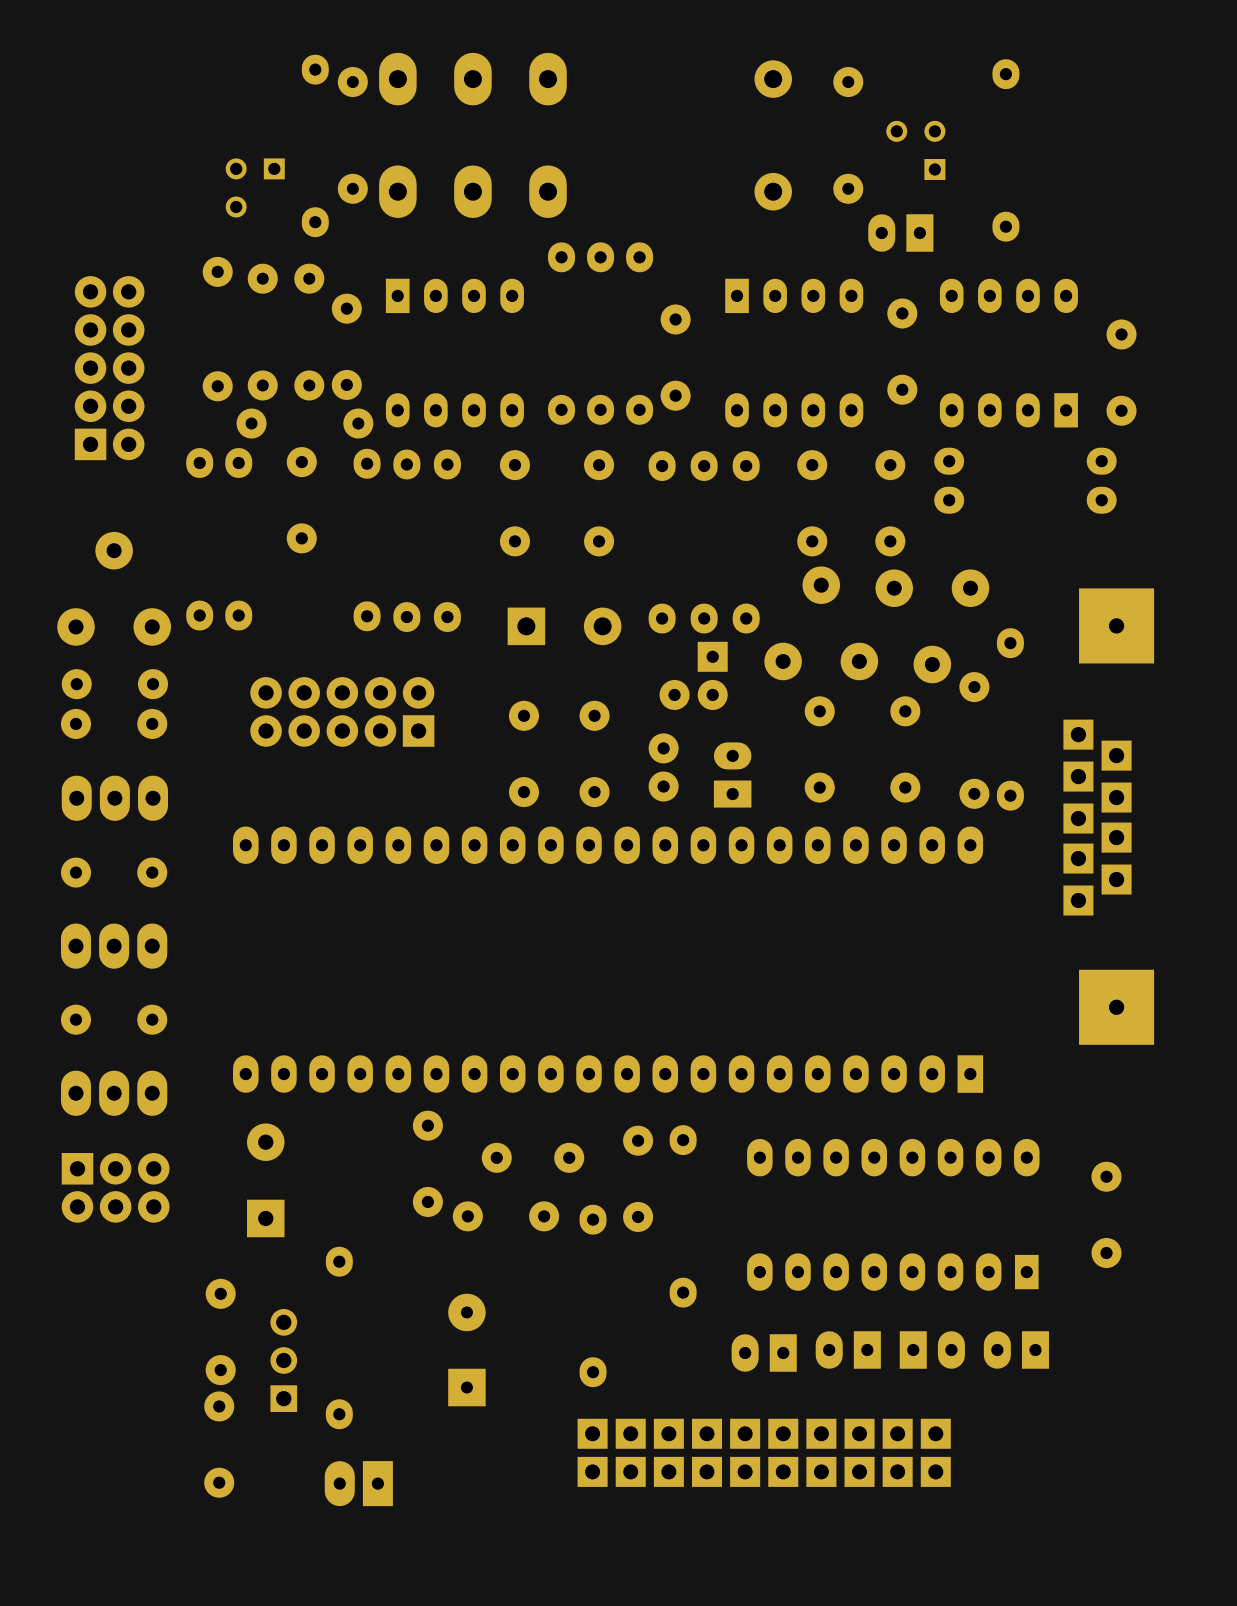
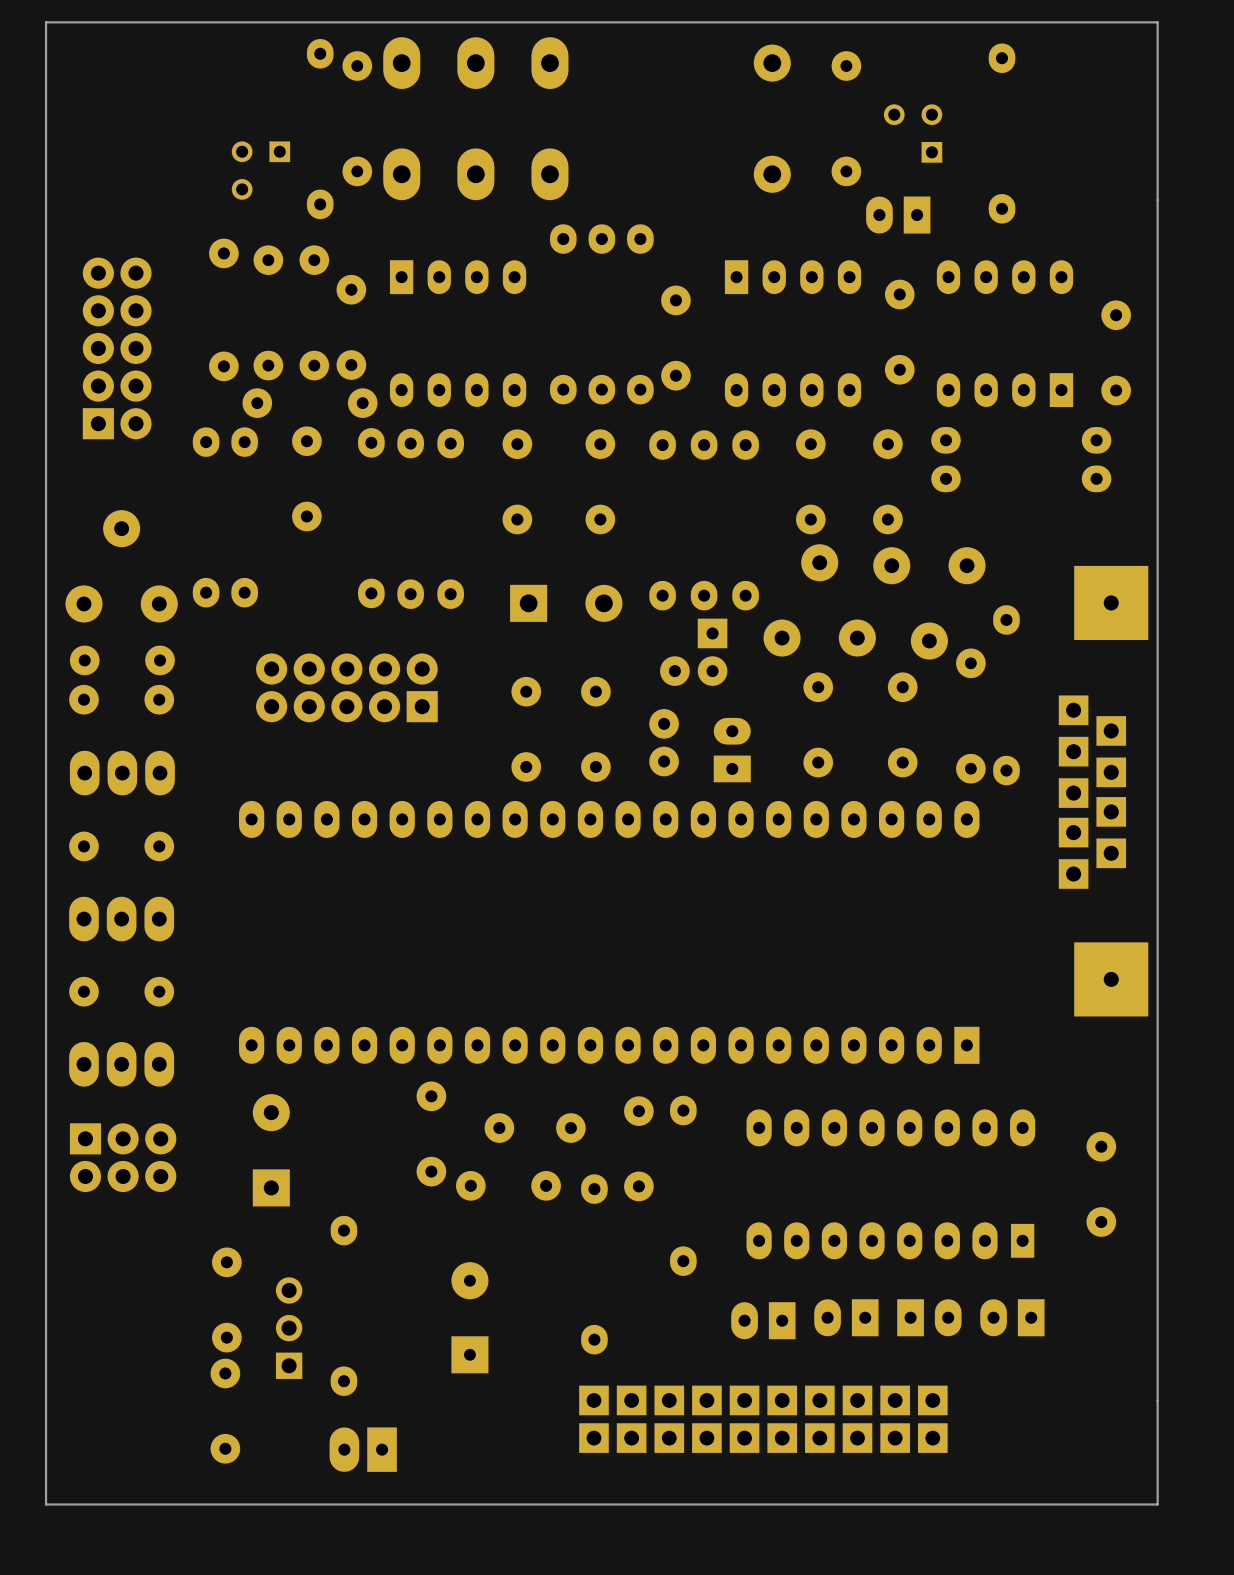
board edge: none -> (1157, 22) (46, 22) (46, 1504) (1157, 1504) (1157, 22)

